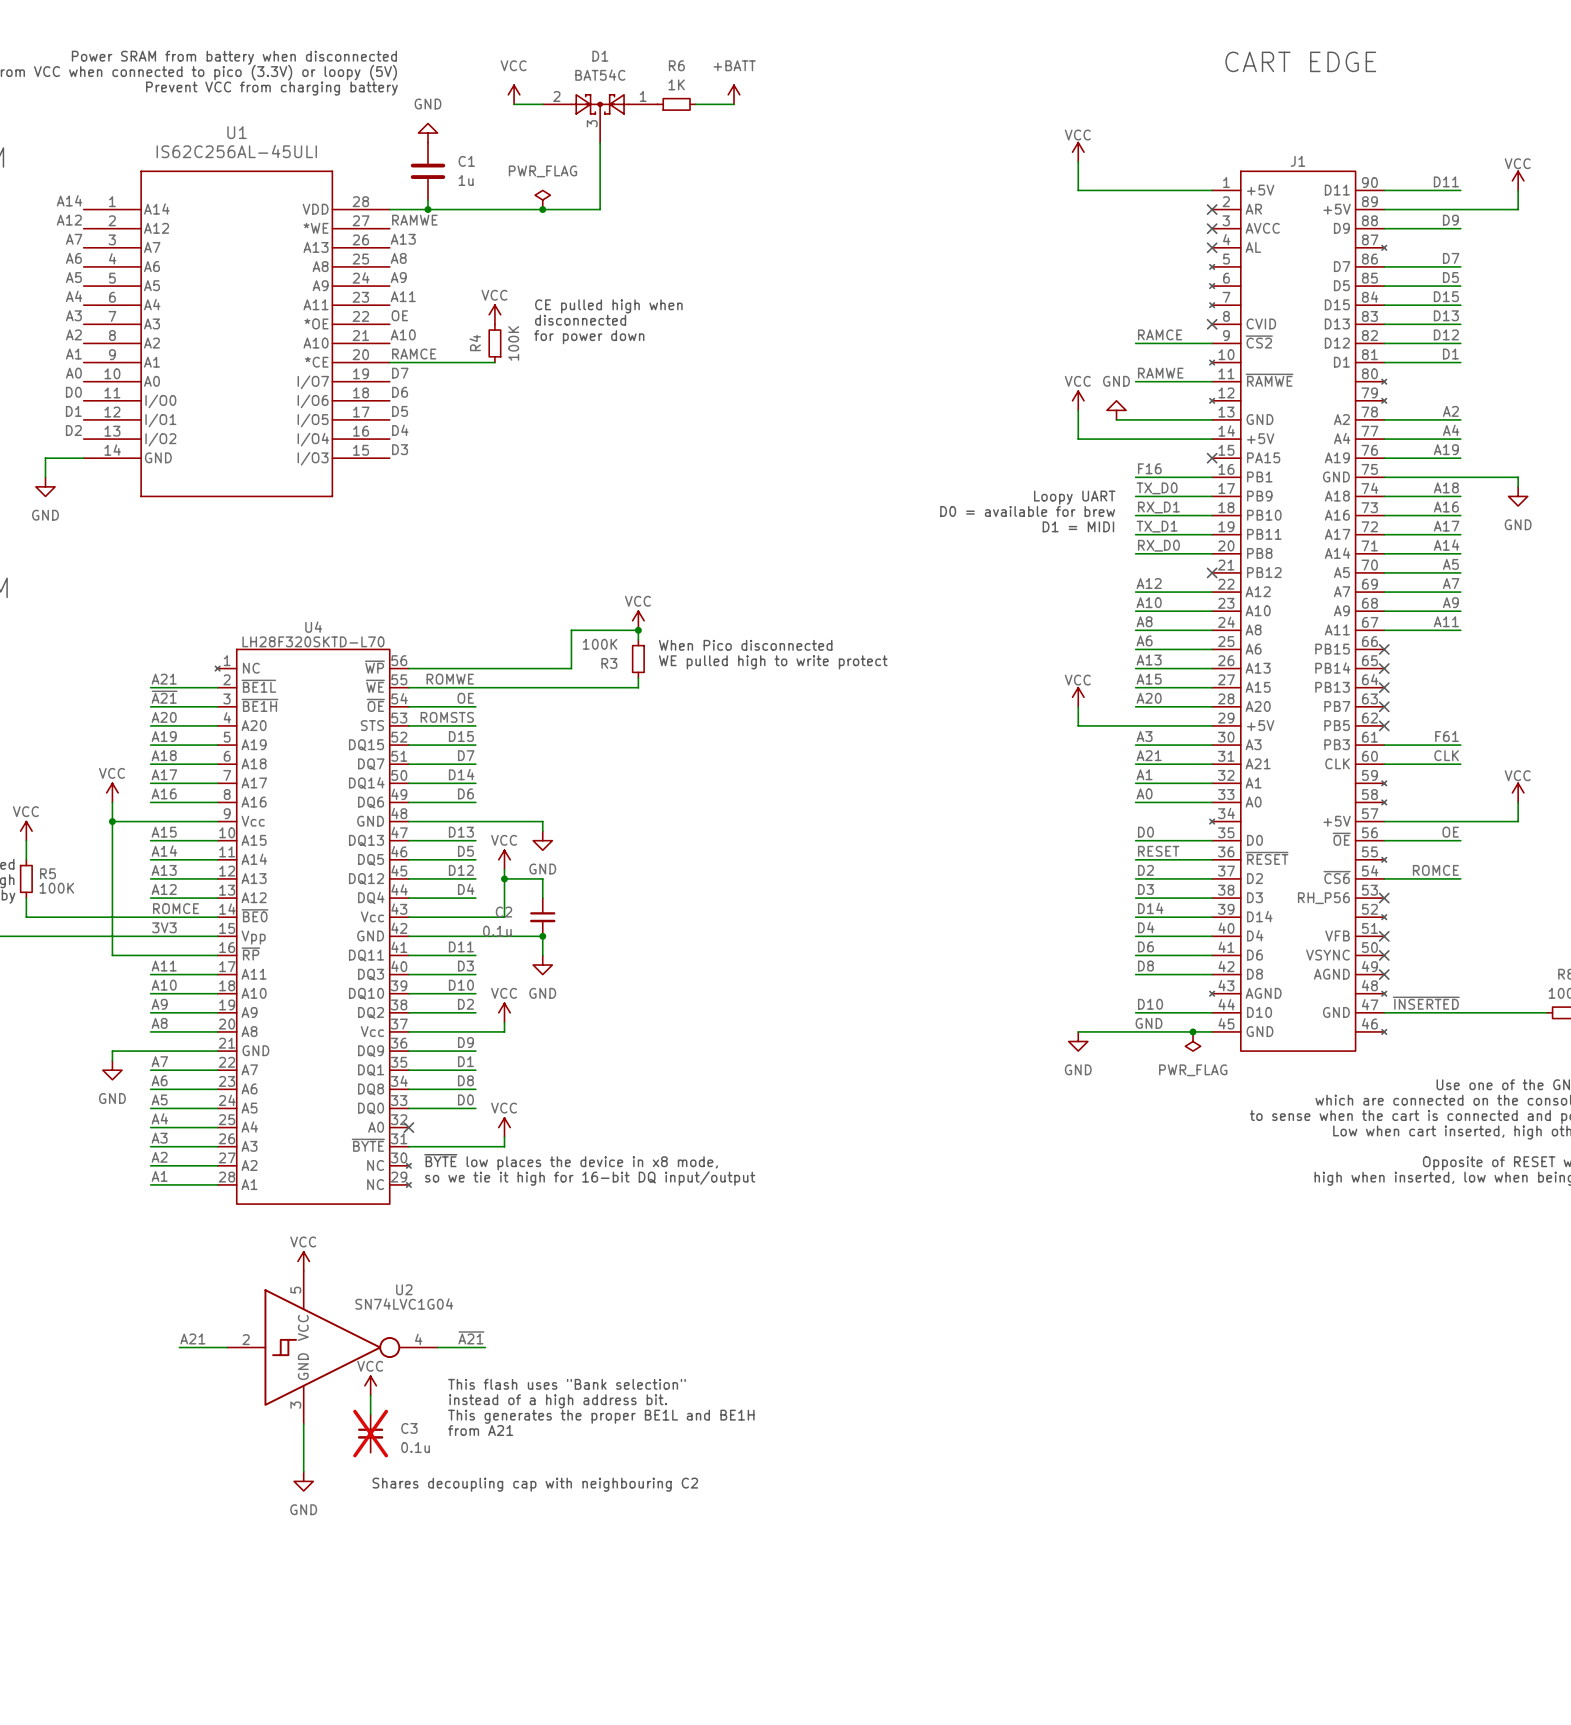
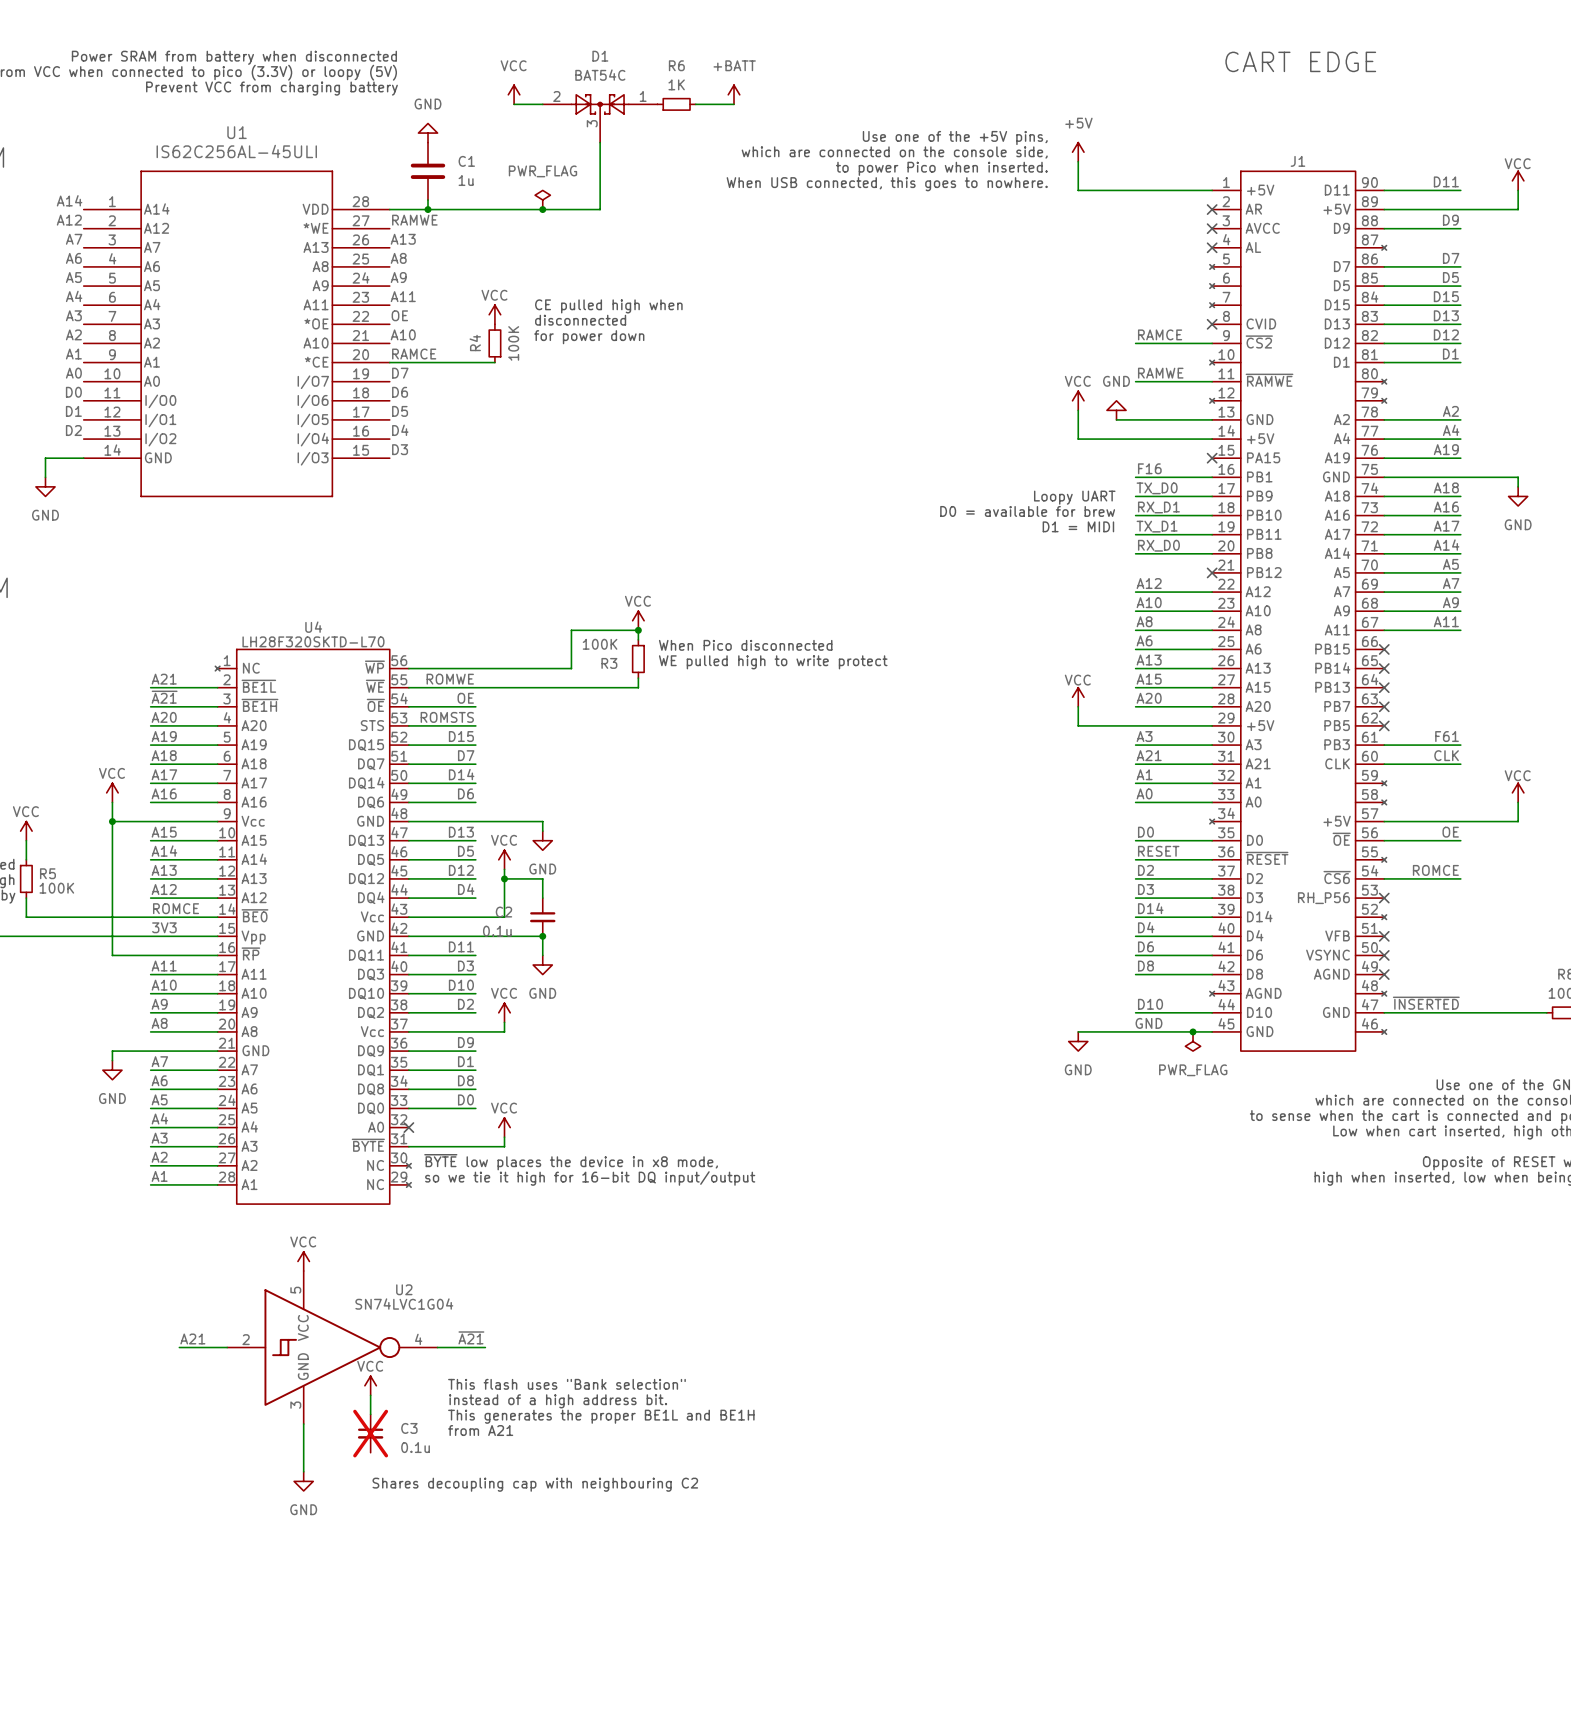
text: none -> Use one of the +5V pins, (955, 138)
text: none -> which are connected on the console side, (894, 152)
power symbol: VCC (1078, 152) -> +5V (1078, 152)
text: none -> to power Pico when inserted. (941, 168)
text: none -> When USB connected, this goes to nowhere. (887, 184)

